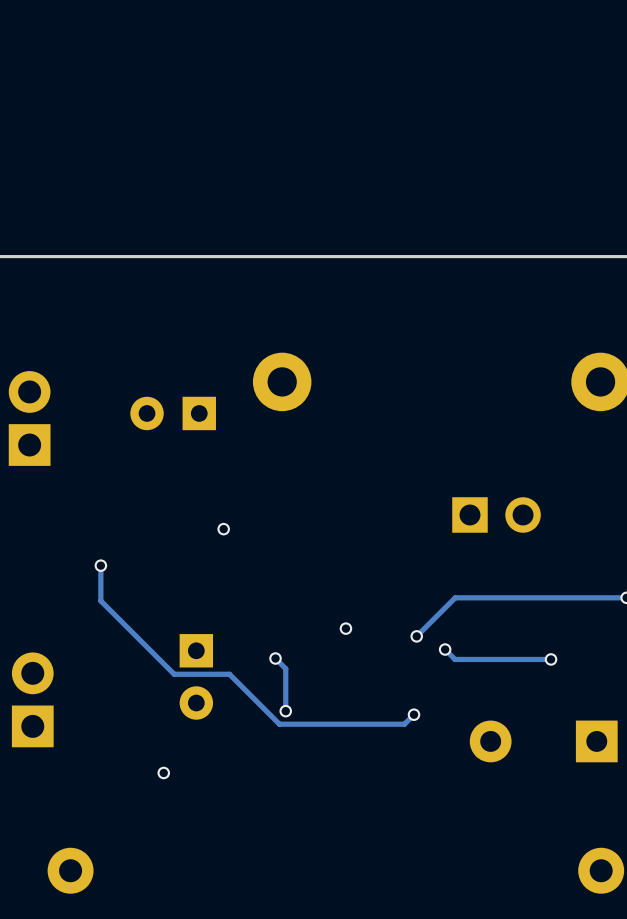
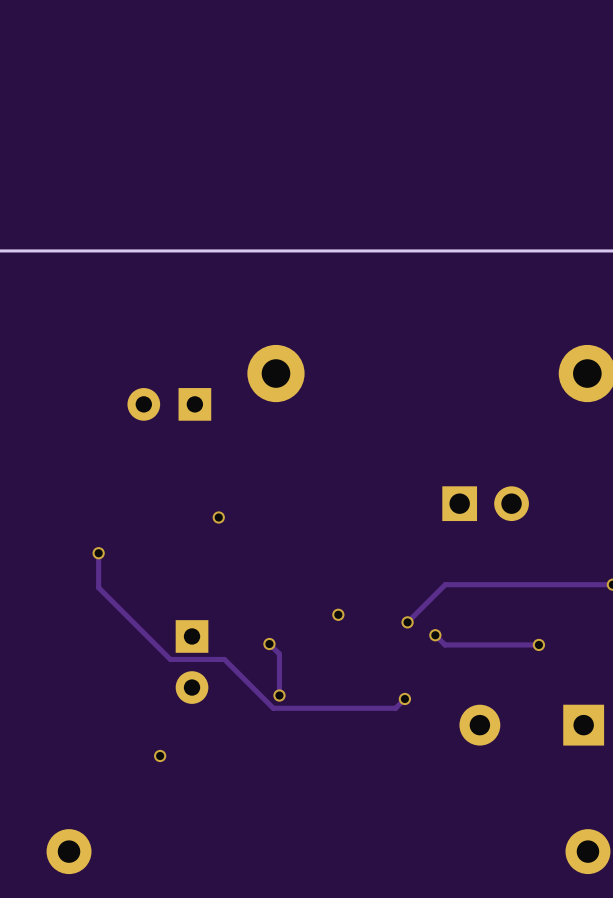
part: (29, 418) -> none
part: (32, 699) -> none

